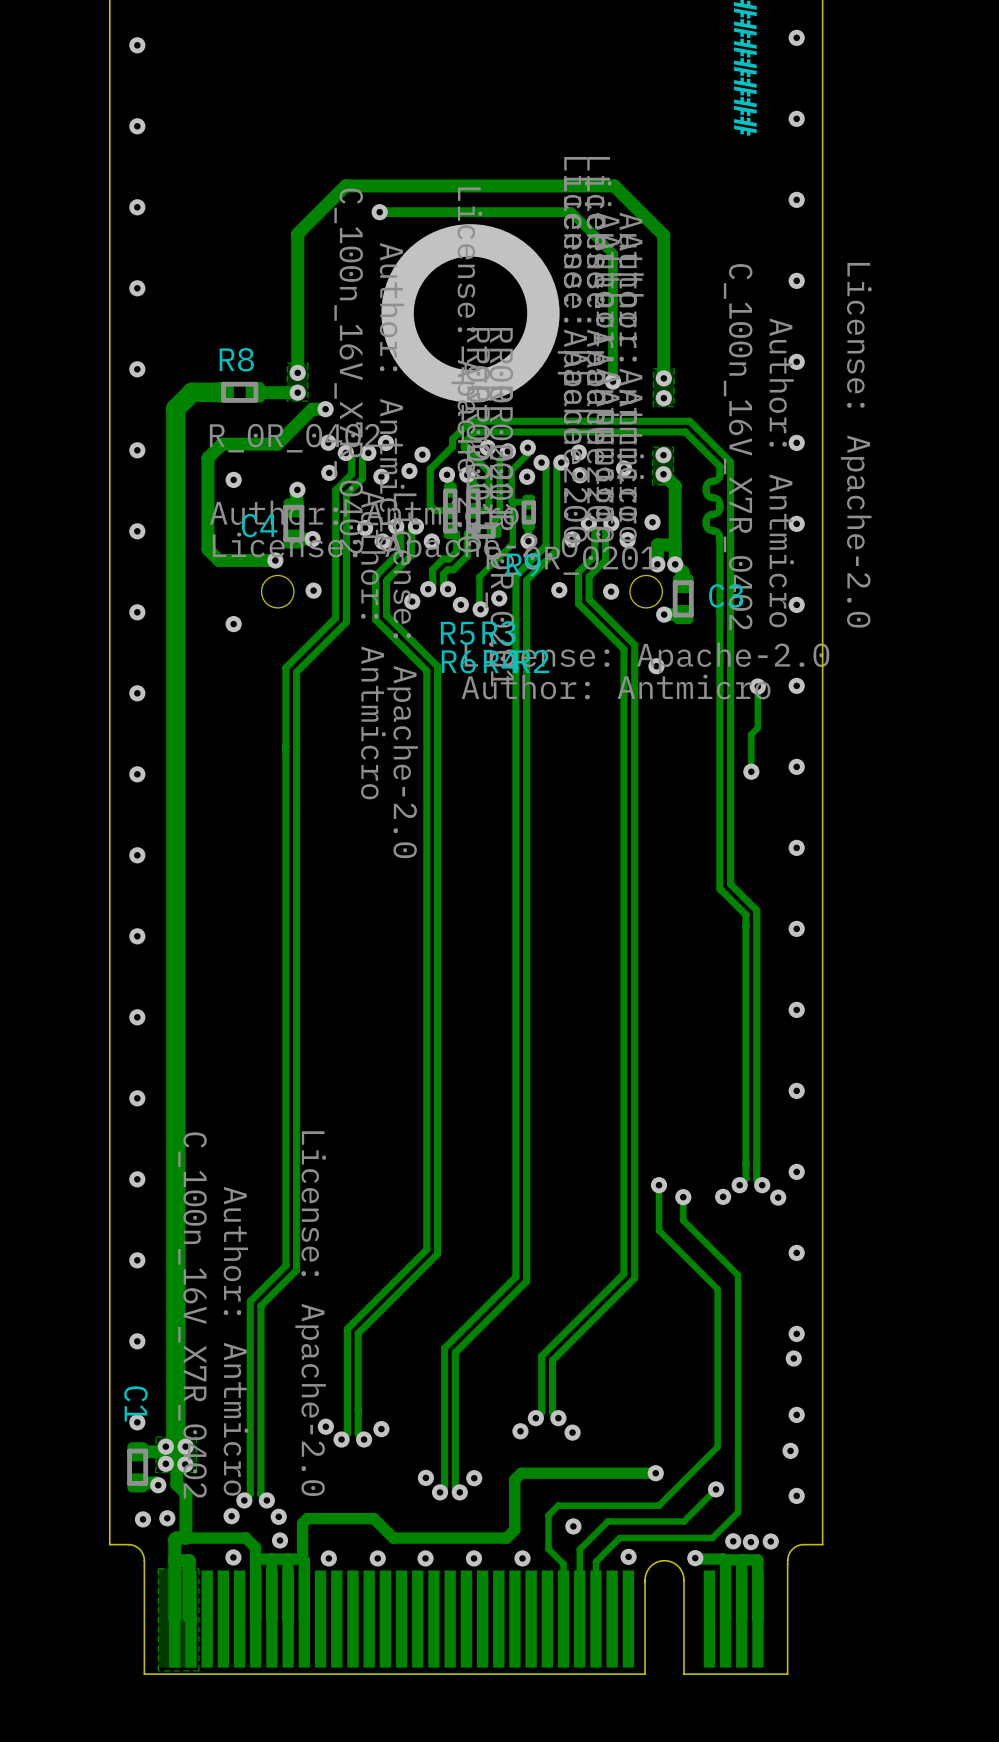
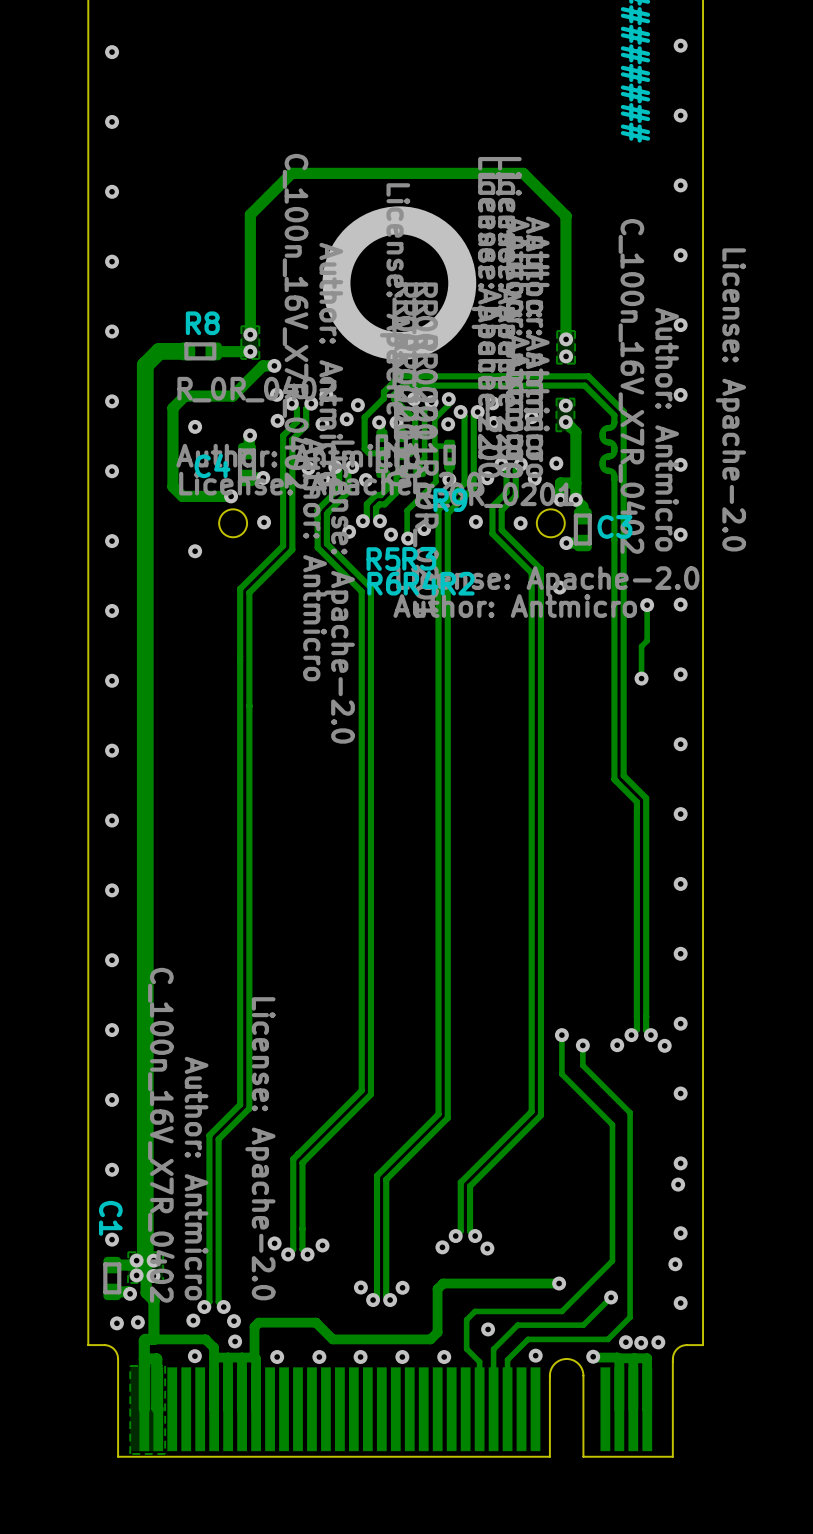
track: (379, 212) (571, 212) (612, 253) (612, 381) -> none
via: (379, 212) -> none
via: (612, 381) -> none

